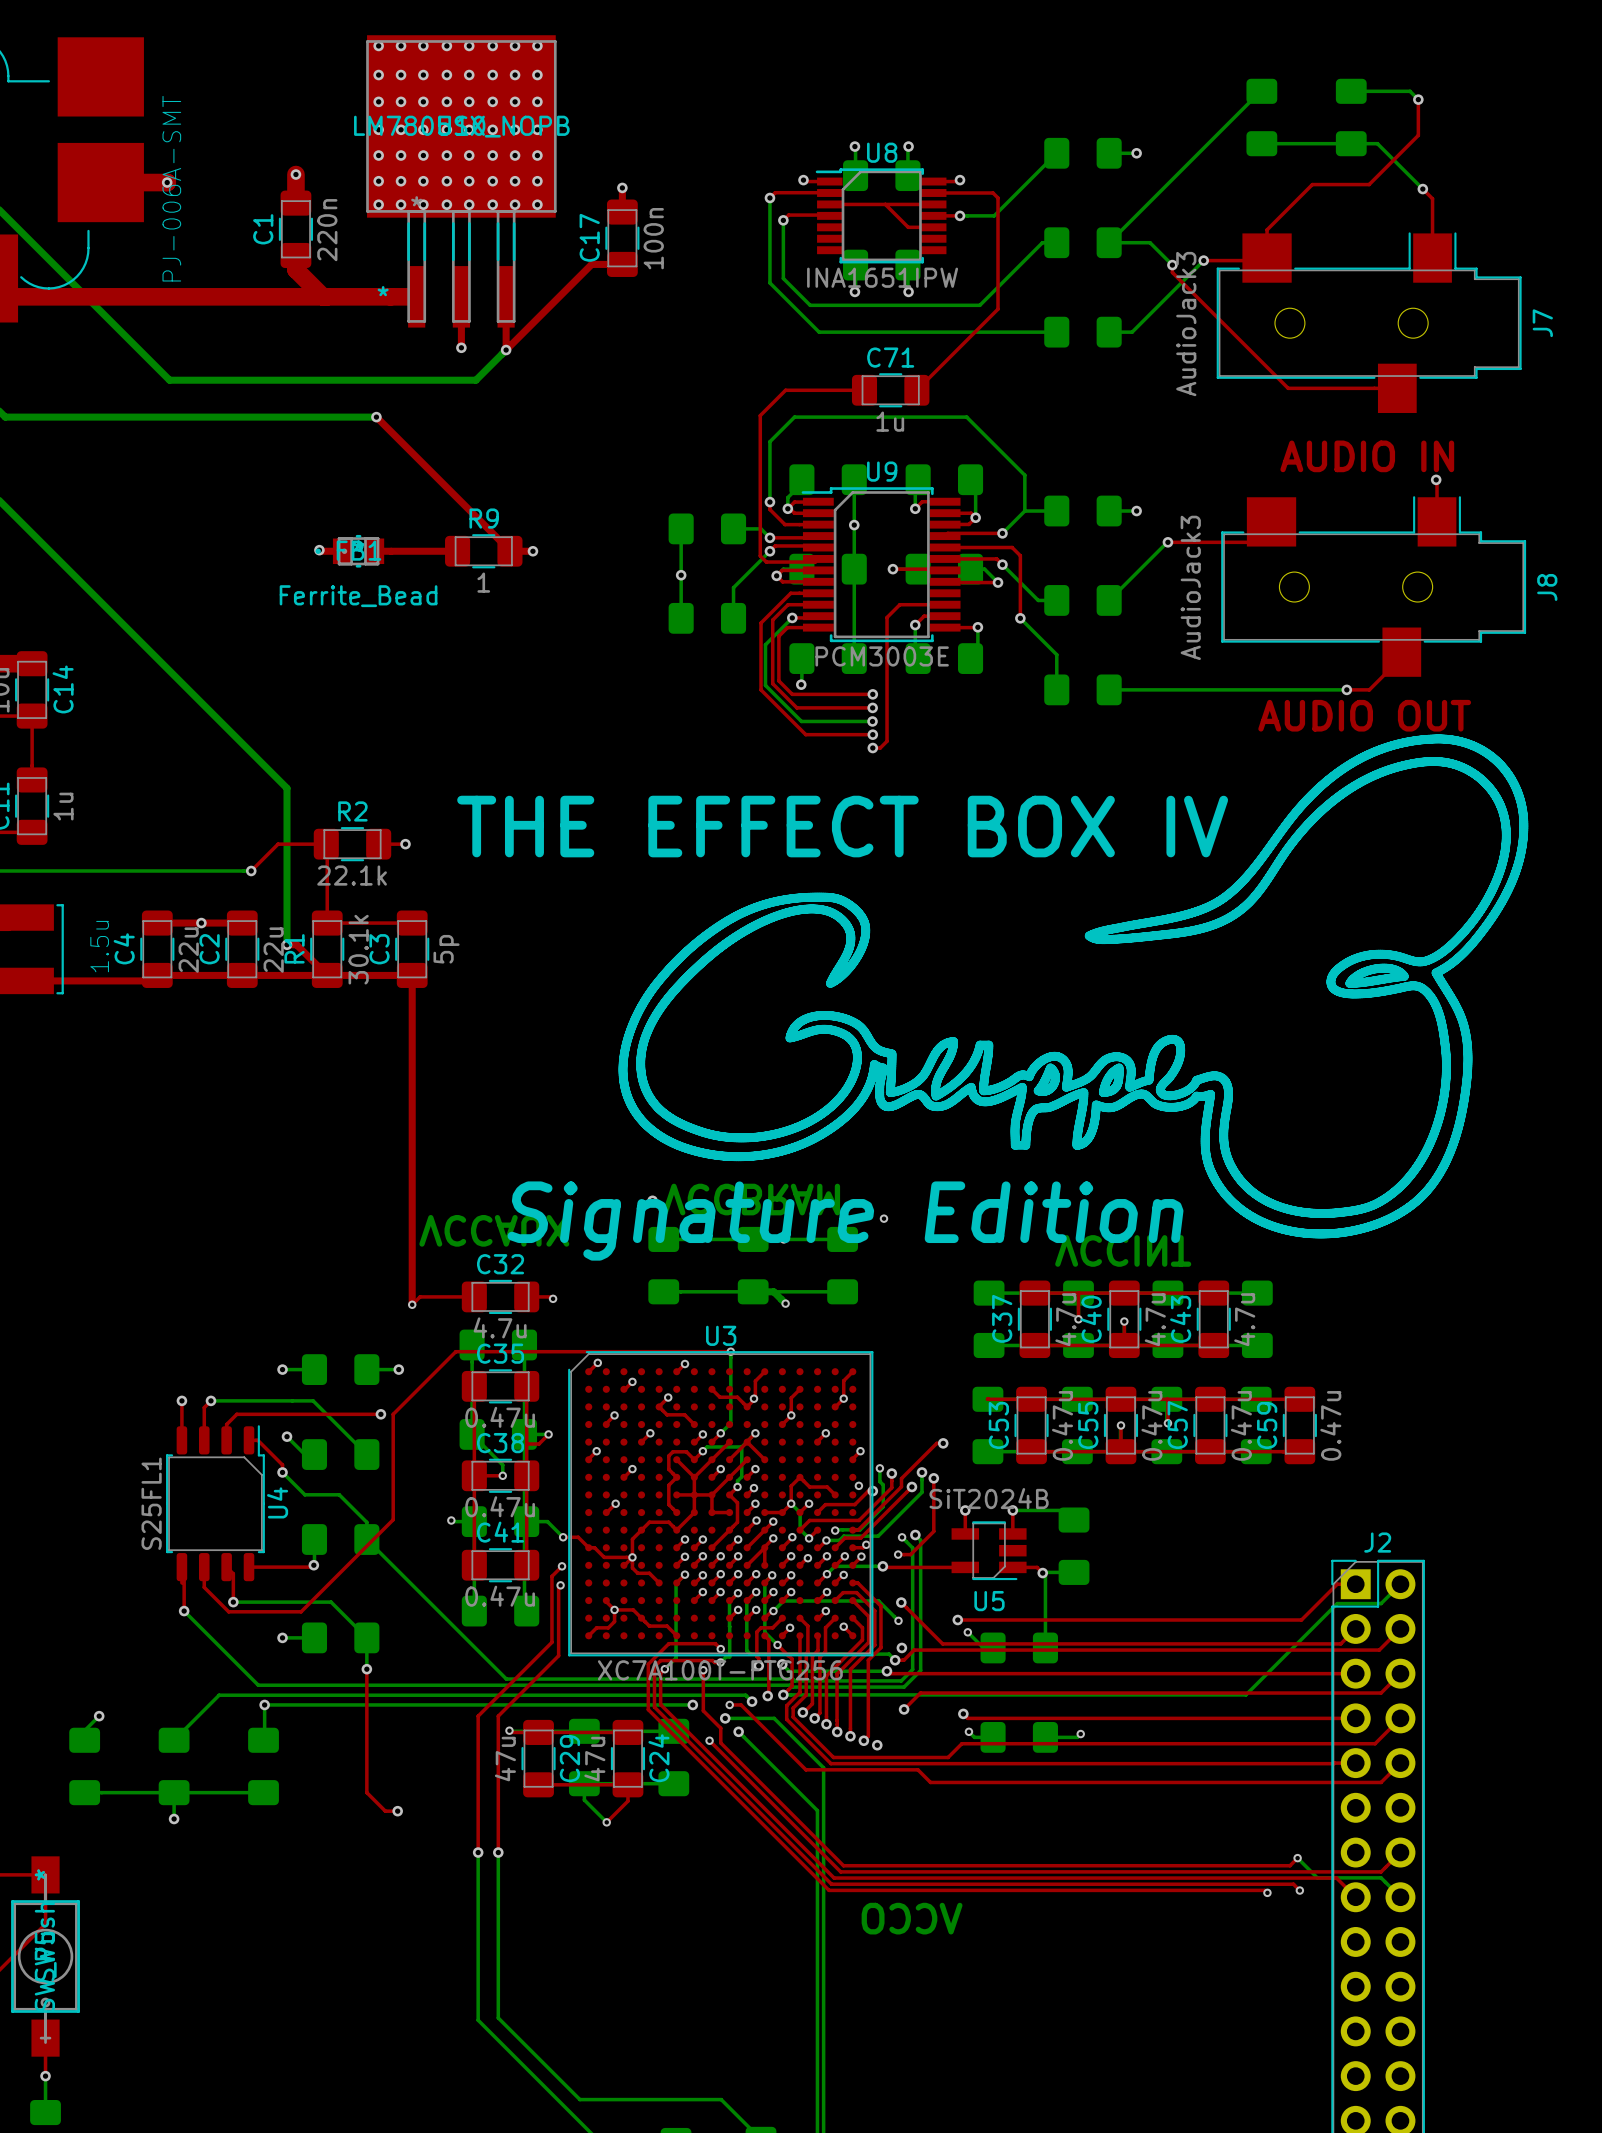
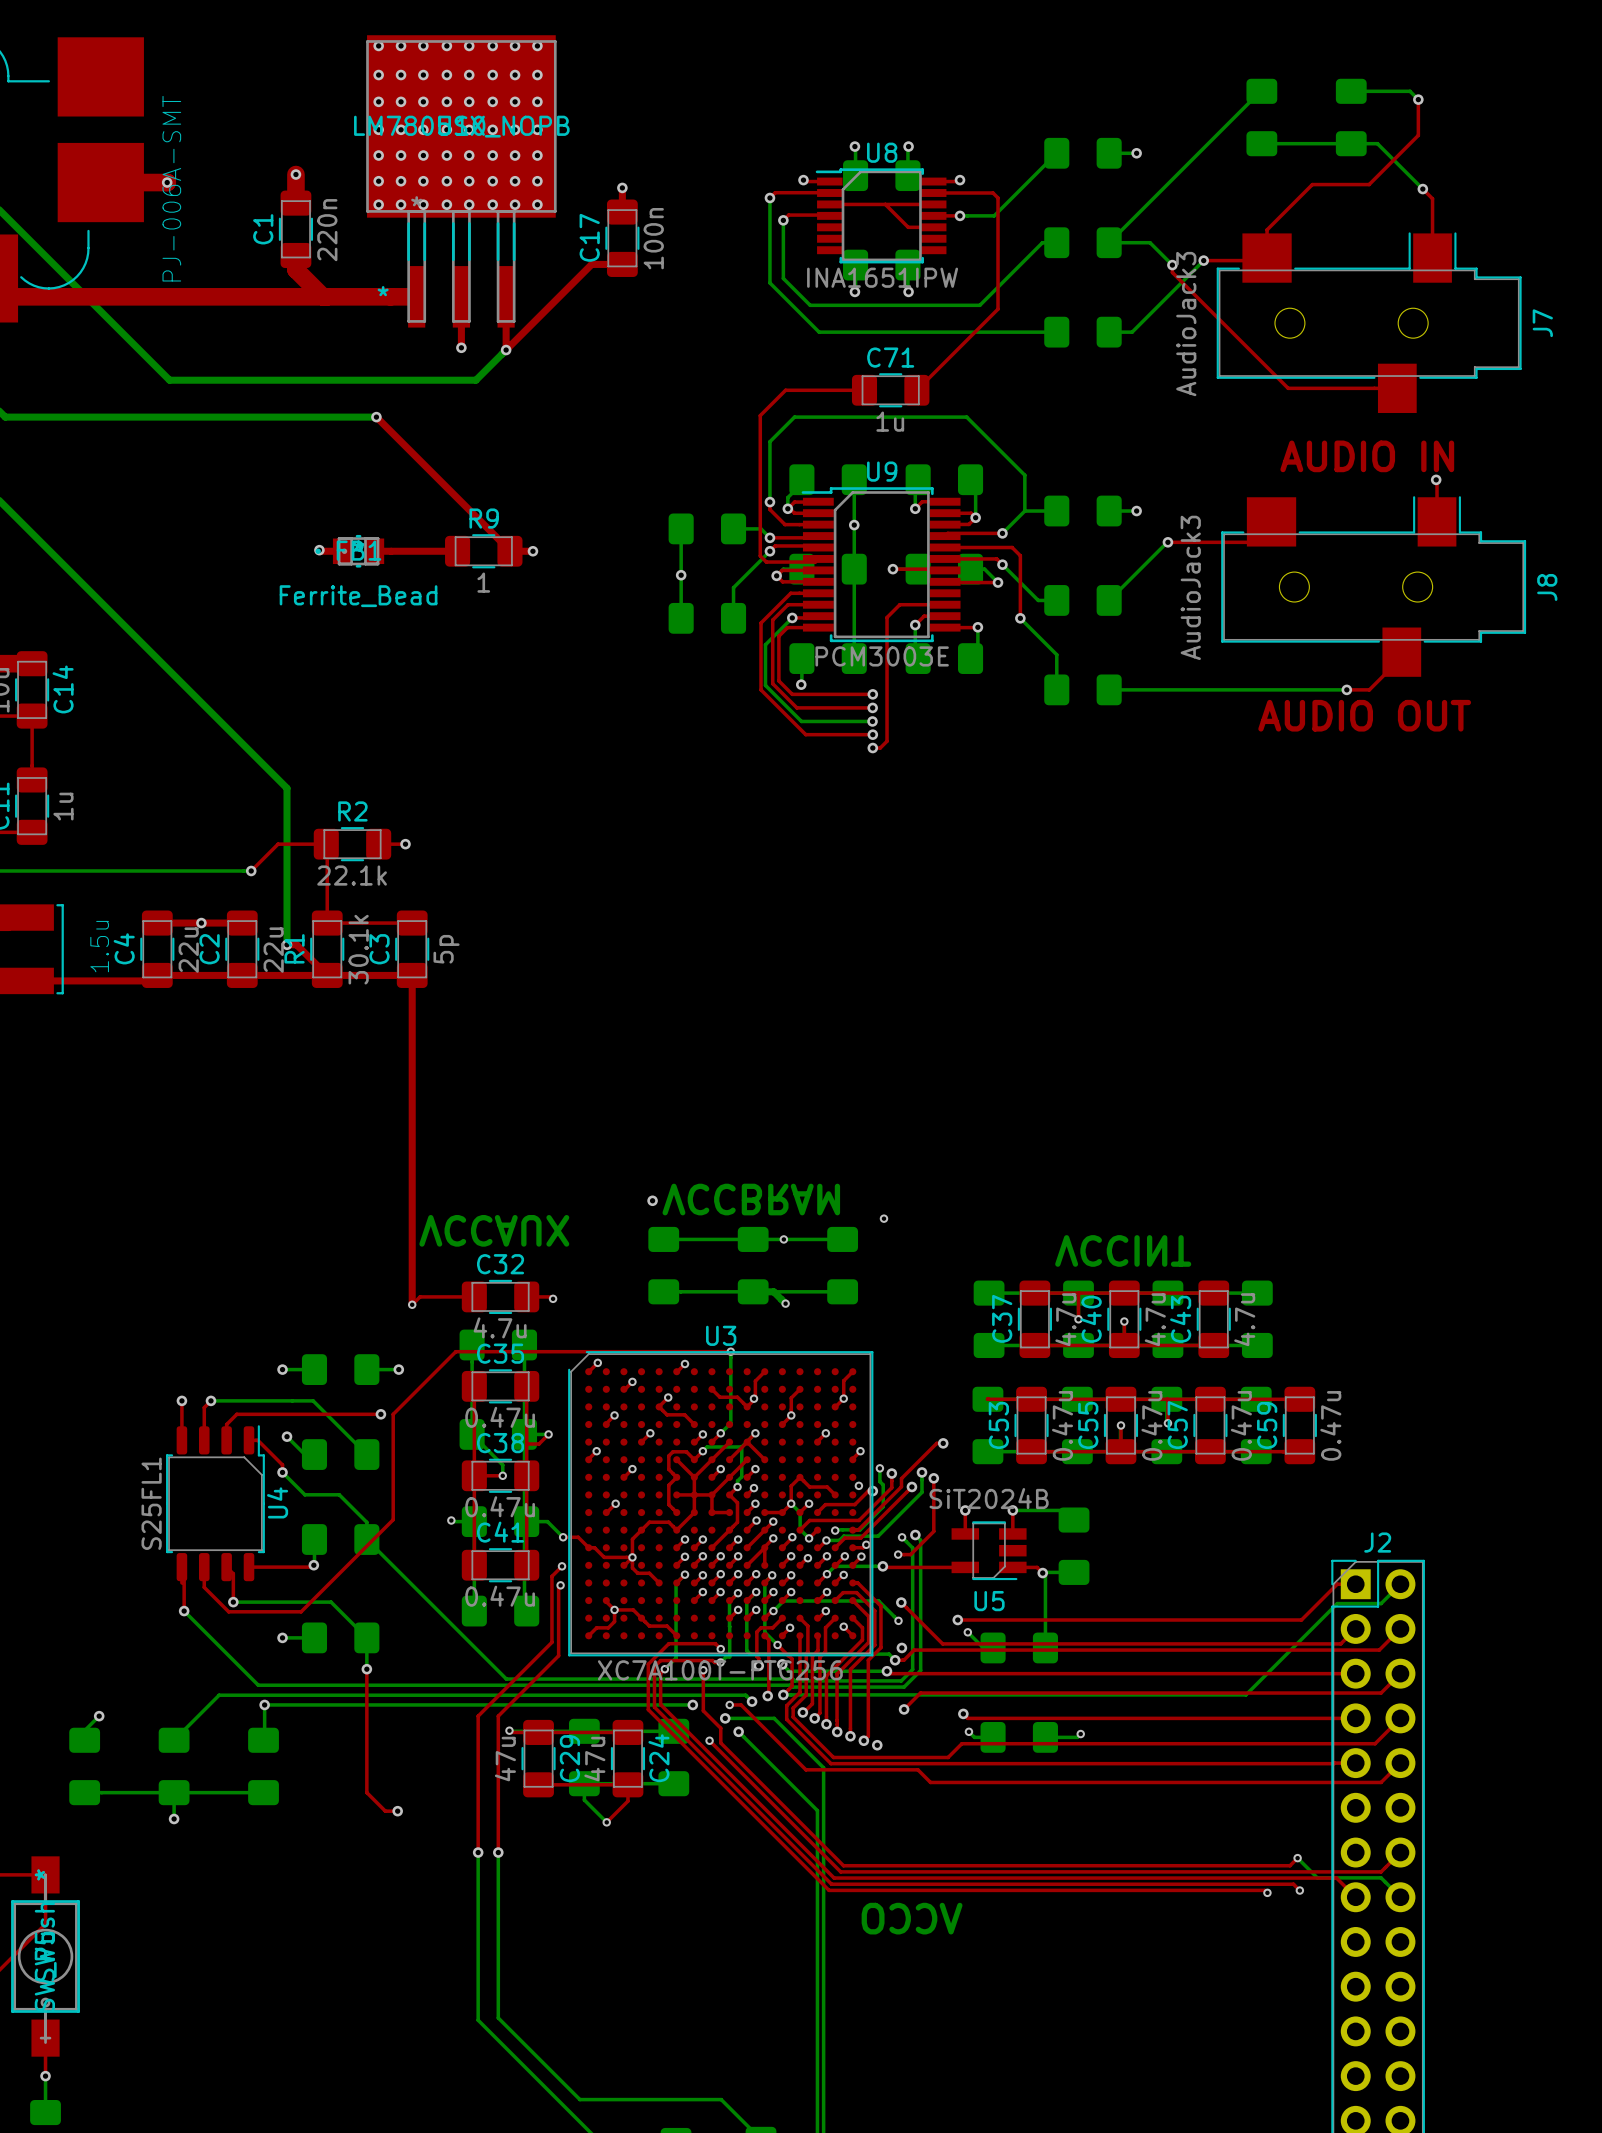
line: (1434, 738) (1407, 741) (1381, 749) (1357, 760) (1335, 774) (1298, 808) (1243, 879) (1216, 902) (1184, 915) (1106, 930) (1089, 935) (1104, 939) (1175, 933) (1204, 927) (1228, 918) (1254, 897) (1291, 843) (1318, 813) (1348, 789) (1380, 772) (1412, 763) (1440, 761) (1462, 767) (1483, 780) (1493, 793) (1501, 808) (1505, 824) (1506, 842) (1502, 862) (1495, 881) (1472, 921) (1448, 947) (1428, 960) (1417, 961) (1385, 954) (1366, 955) (1344, 964) (1336, 970) (1331, 978) (1333, 988) (1347, 993) (1372, 992) (1410, 985) (1420, 987) (1434, 1002) (1442, 1026) (1446, 1054) (1445, 1080) (1441, 1107) (1434, 1133) (1423, 1156) (1409, 1177) (1392, 1193) (1374, 1204) (1344, 1212) (1307, 1212) (1276, 1205) (1251, 1191) (1234, 1172) (1225, 1151) (1223, 1131) (1228, 1093) (1223, 1079) (1214, 1075) (1196, 1080) (1189, 1089) (1175, 1095) (1166, 1095) (1160, 1091) (1161, 1086) (1173, 1072) (1179, 1057) (1180, 1045) (1173, 1039) (1163, 1042) (1156, 1049) (1151, 1061) (1149, 1080) (1129, 1087) (1130, 1066) (1122, 1057) (1115, 1056) (1107, 1058) (1088, 1077) (1066, 1087) (1066, 1064) (1062, 1058) (1054, 1056) (1040, 1062) (1029, 1076) (1020, 1075) (1001, 1086) (983, 1090) (988, 1045) (980, 1045) (974, 1059) (966, 1072) (953, 1084) (936, 1096) (936, 1082) (950, 1055) (953, 1041) (945, 1043) (938, 1048) (924, 1073) (917, 1081) (904, 1088) (890, 1092) (892, 1053) (876, 1048) (862, 1029) (852, 1021) (835, 1016) (817, 1015) (798, 1023) (789, 1038) (817, 1029) (835, 1031) (851, 1040) (855, 1047) (857, 1056) (854, 1073) (846, 1089) (833, 1104) (817, 1117) (799, 1126) (780, 1132) (738, 1137) (701, 1131) (680, 1123) (664, 1113) (654, 1103) (646, 1090) (641, 1077) (640, 1062) (647, 1032) (666, 999) (699, 965) (734, 937) (769, 918) (803, 909) (818, 909) (831, 912) (842, 920) (849, 929) (850, 937) (849, 947) (830, 983) (834, 981) (846, 971) (856, 957) (863, 943) (865, 929) (863, 919) (855, 909) (844, 901) (832, 897) (789, 899) (750, 909) (712, 930) (677, 960) (647, 996) (629, 1032) (624, 1051) (622, 1069) (624, 1085) (629, 1101) (645, 1124) (670, 1141) (702, 1152) (740, 1156) (765, 1154) (789, 1148) (811, 1140) (832, 1127) (849, 1113) (862, 1098) (870, 1081) (874, 1064) (883, 1067) (879, 1097) (882, 1104) (887, 1106) (918, 1094) (931, 1105) (942, 1106) (971, 1087) (977, 1099) (989, 1101) (1022, 1087) (1015, 1122) (1015, 1145) (1025, 1145) (1028, 1122) (1035, 1109) (1050, 1107) (1082, 1093) (1083, 1092) (1083, 1099) (1076, 1145) (1084, 1142) (1090, 1133) (1096, 1104) (1113, 1107) (1134, 1095) (1142, 1093) (1158, 1105) (1176, 1107) (1189, 1103) (1196, 1096) (1210, 1094) (1205, 1136) (1207, 1161) (1220, 1188) (1243, 1210) (1274, 1226) (1310, 1233) (1348, 1231) (1385, 1220) (1409, 1207) (1426, 1191) (1441, 1170) (1452, 1145) (1464, 1095) (1467, 1067) (1467, 1044) (1459, 1013) (1436, 972) (1451, 963) (1464, 952) (1494, 913) (1514, 875) (1523, 839) (1523, 818) (1520, 798) (1512, 781) (1502, 766) (1488, 754) (1472, 745) (1454, 740) (1434, 738) -> none
text: THE EFFECT BOX IV (842, 826) -> none
line: (1381, 968) (1361, 973) (1349, 983) (1404, 976) (1395, 969) (1381, 968) -> none
line: (1050, 1067) (1055, 1075) (1053, 1084) (1047, 1090) (1038, 1090) (1050, 1067) -> none
line: (1119, 1067) (1109, 1076) (1103, 1092) (1111, 1090) (1116, 1086) (1119, 1067) -> none
text: Signature Edition (845, 1221) -> none

